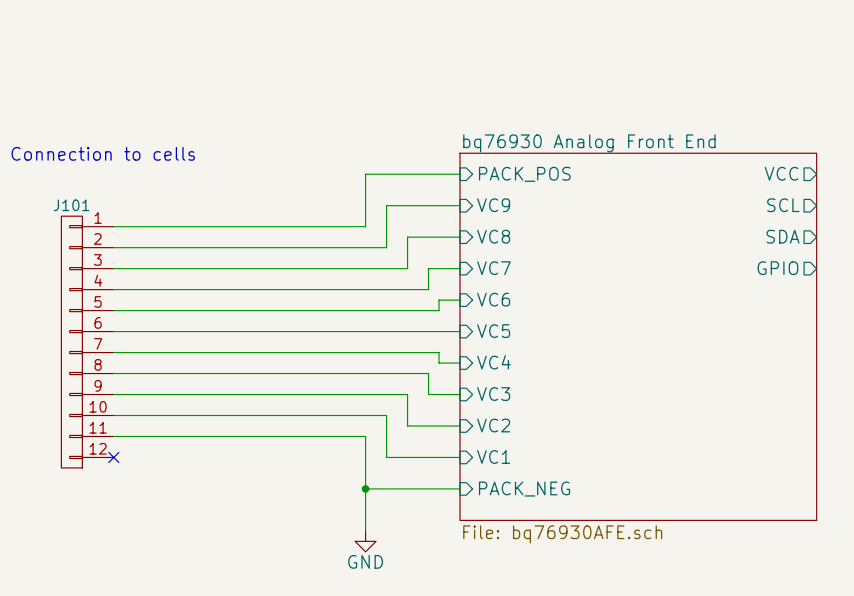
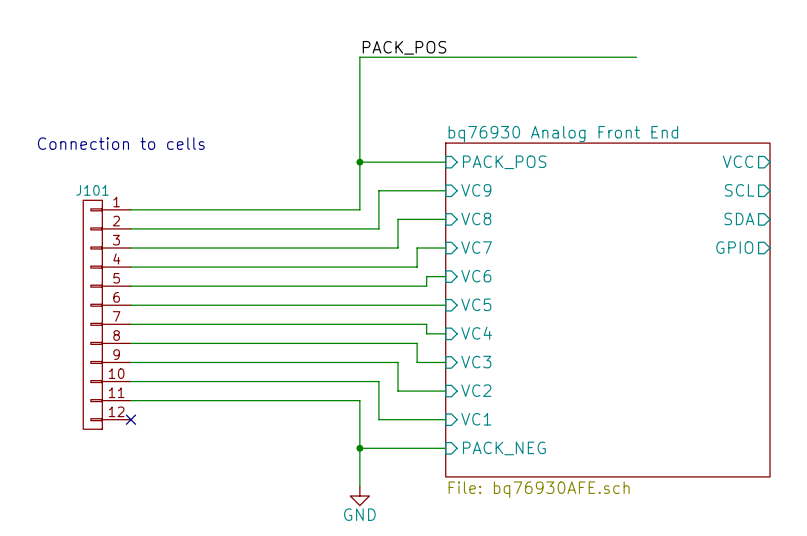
label: none -> PACK_POS (404, 47)
wire: none -> (636, 57) (359, 57) (359, 162)
junction: none -> (359, 162)

